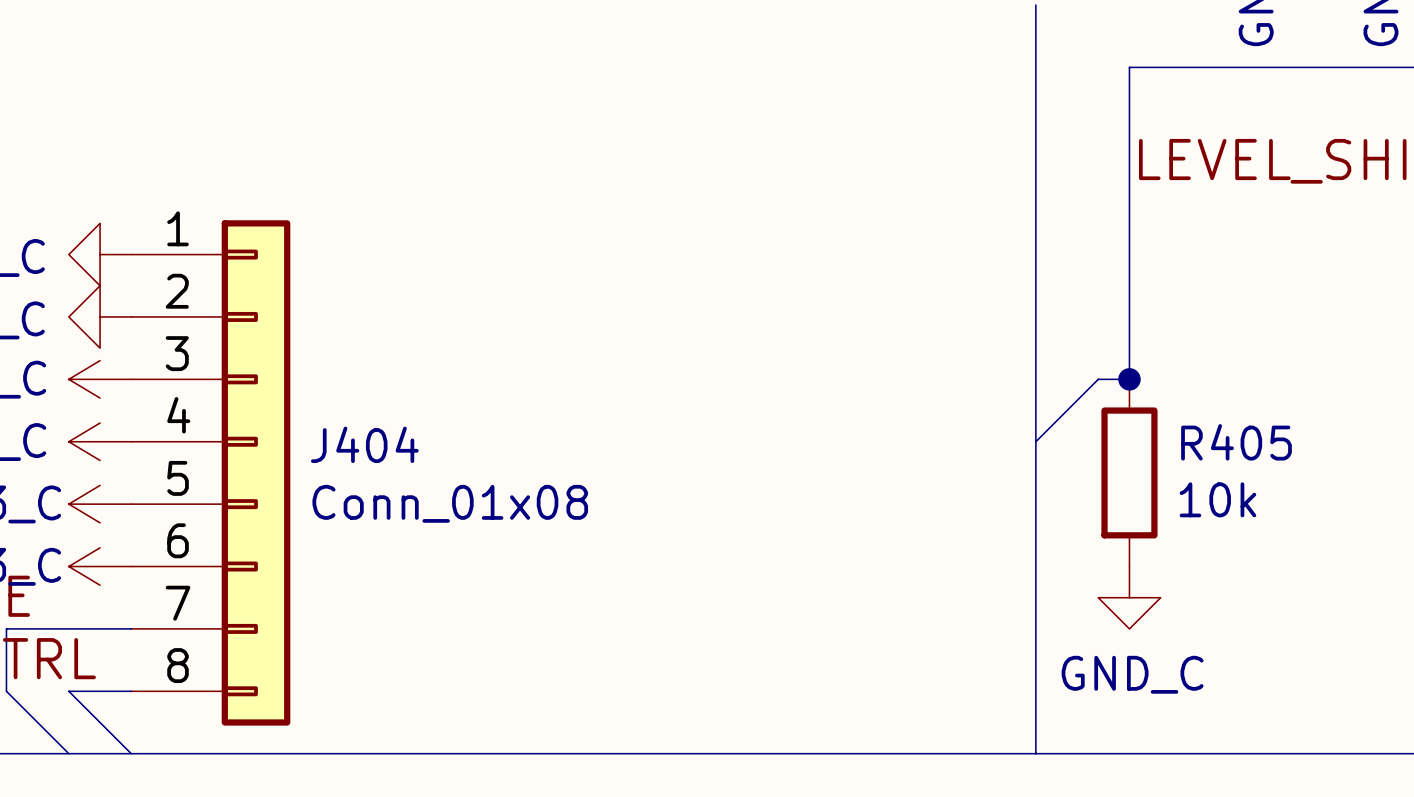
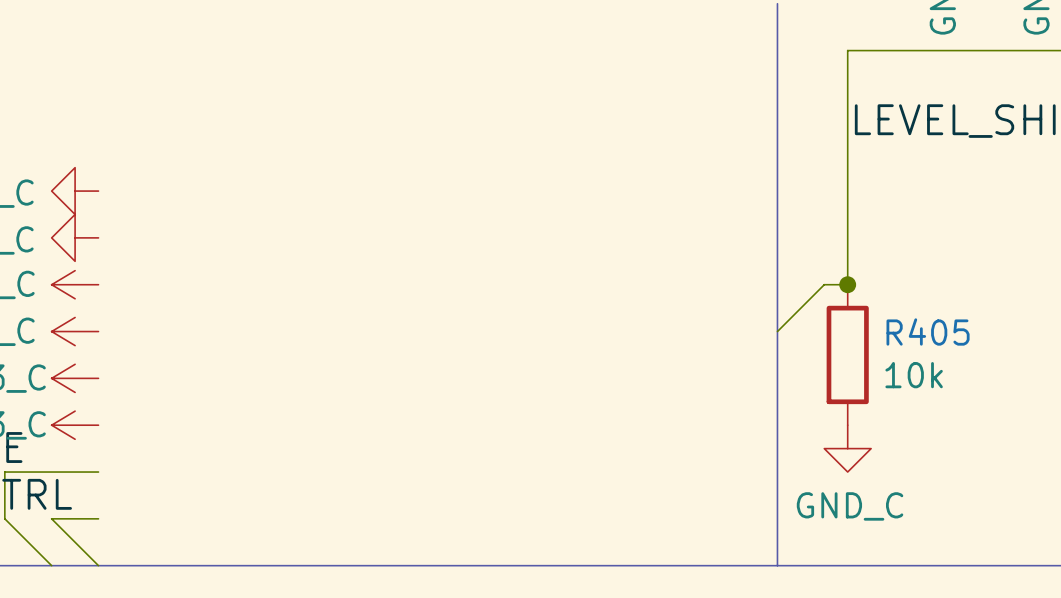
J404: Conn_01x08 (210, 472) -> none

